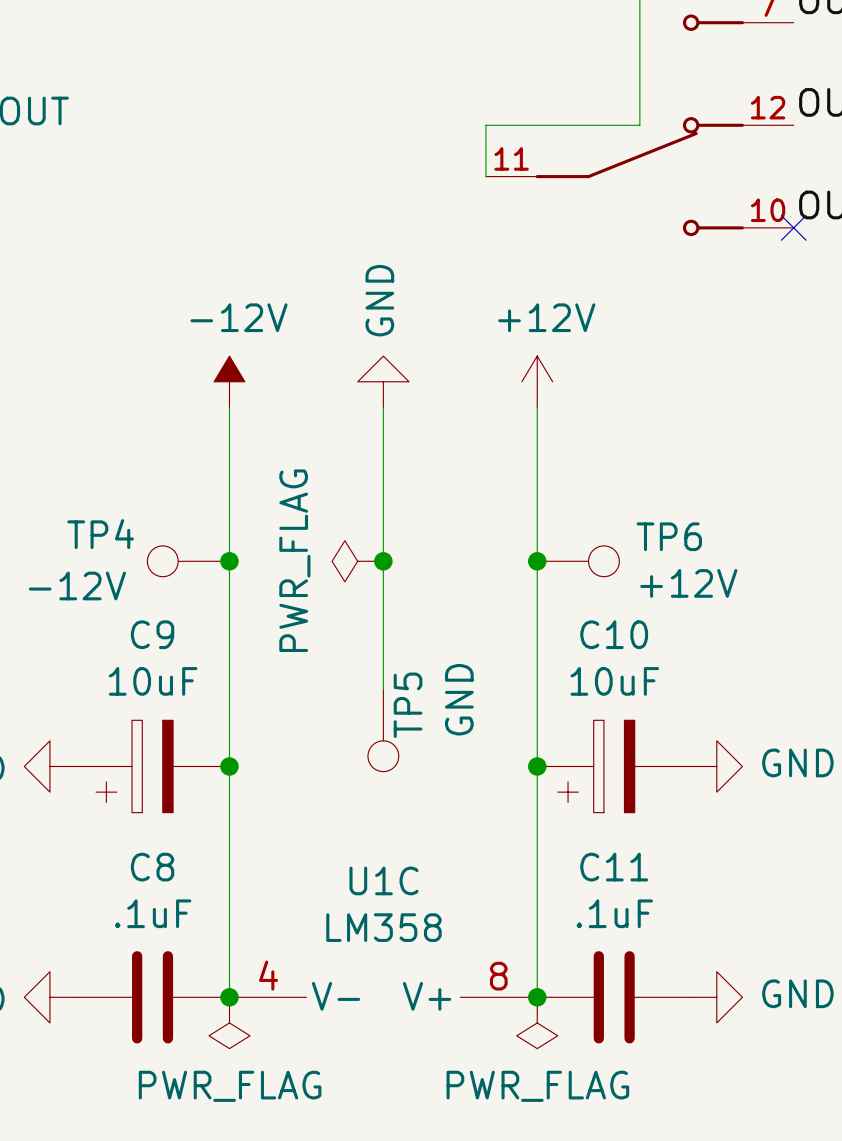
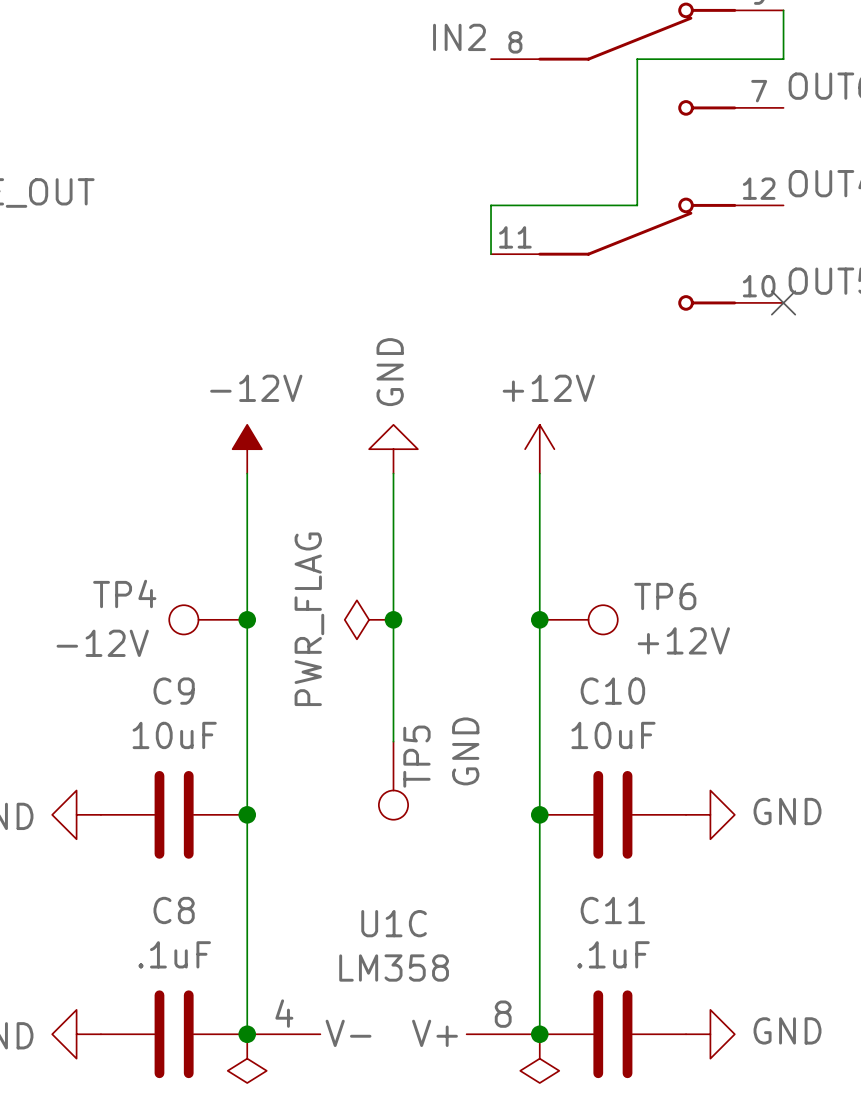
C9 symbol: [75, 720, 230, 813] -> [100, 770, 248, 859]
C10 symbol: [537, 720, 692, 813] -> [539, 770, 687, 859]

